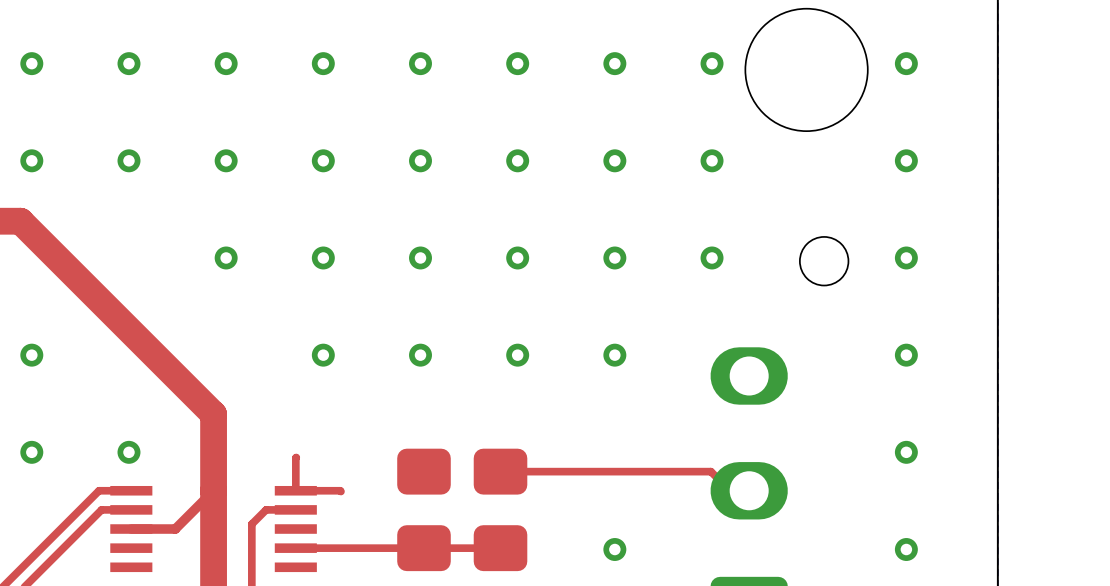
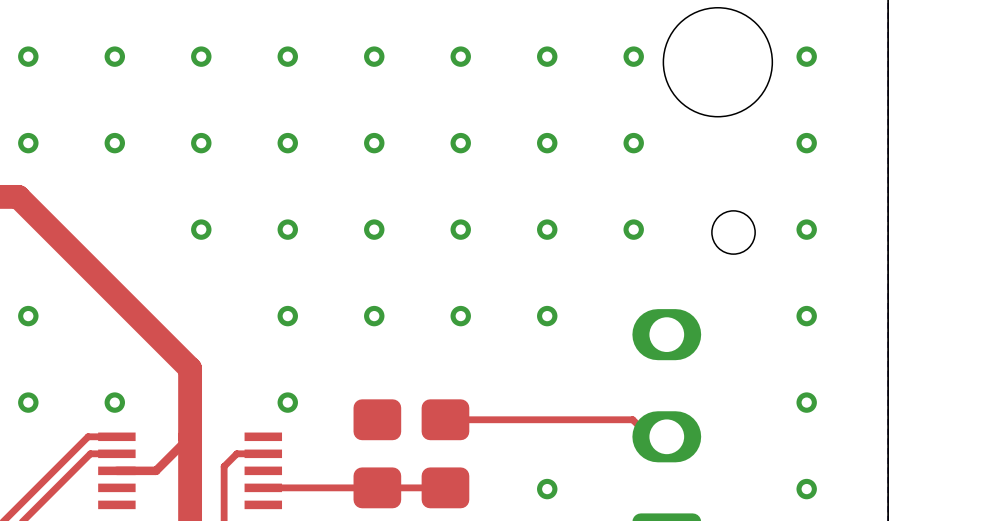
via: none -> (287, 402)
top track: (295, 457) (295, 490) (340, 491) -> none

